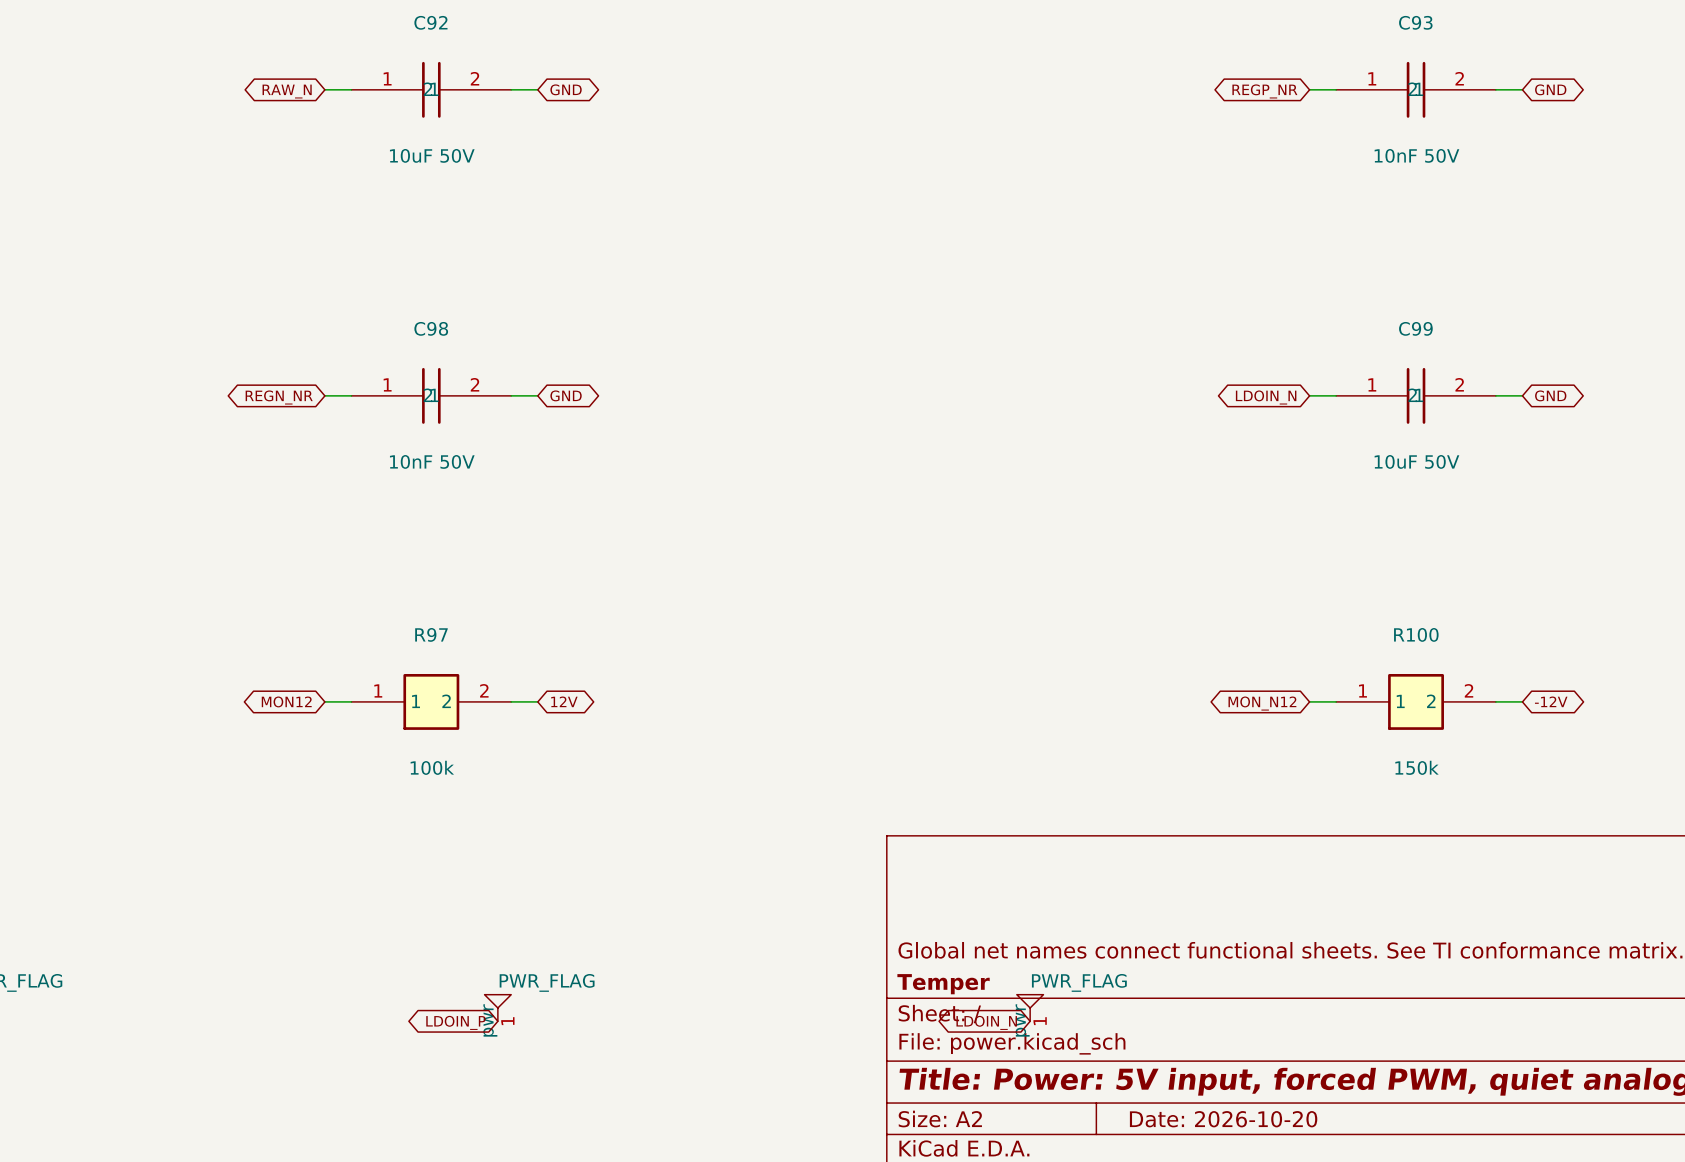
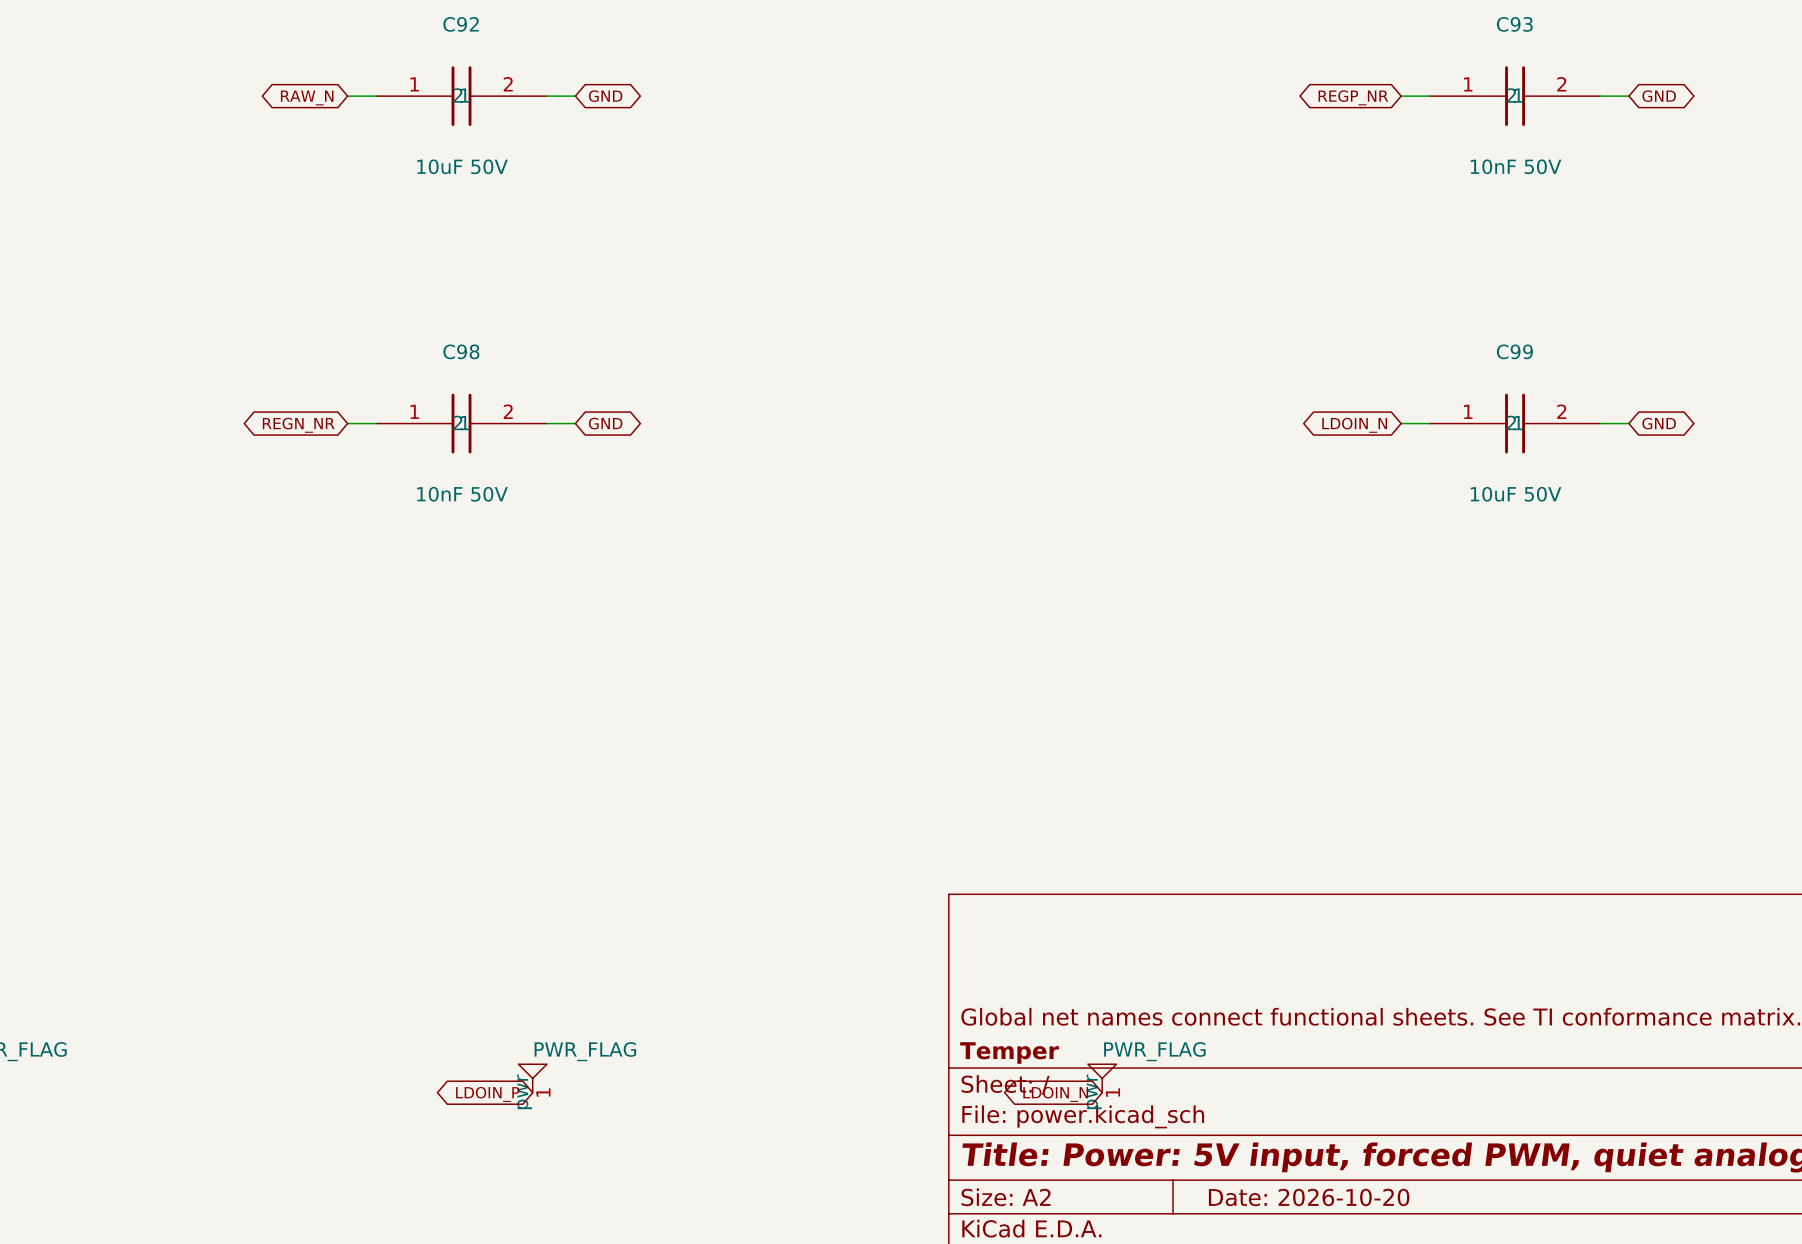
global label: MON12 (286, 701) -> none
wire: (324, 701) (351, 701) -> none
R97: 100k (431, 701) -> none
wire: (511, 701) (537, 701) -> none
global label: 12V (564, 701) -> none
wire: (1309, 701) (1336, 701) -> none
R100: 150k (1416, 701) -> none
wire: (1495, 701) (1522, 701) -> none
global label: -12V (1551, 701) -> none
global label: MON_N12 (1262, 703) -> none

